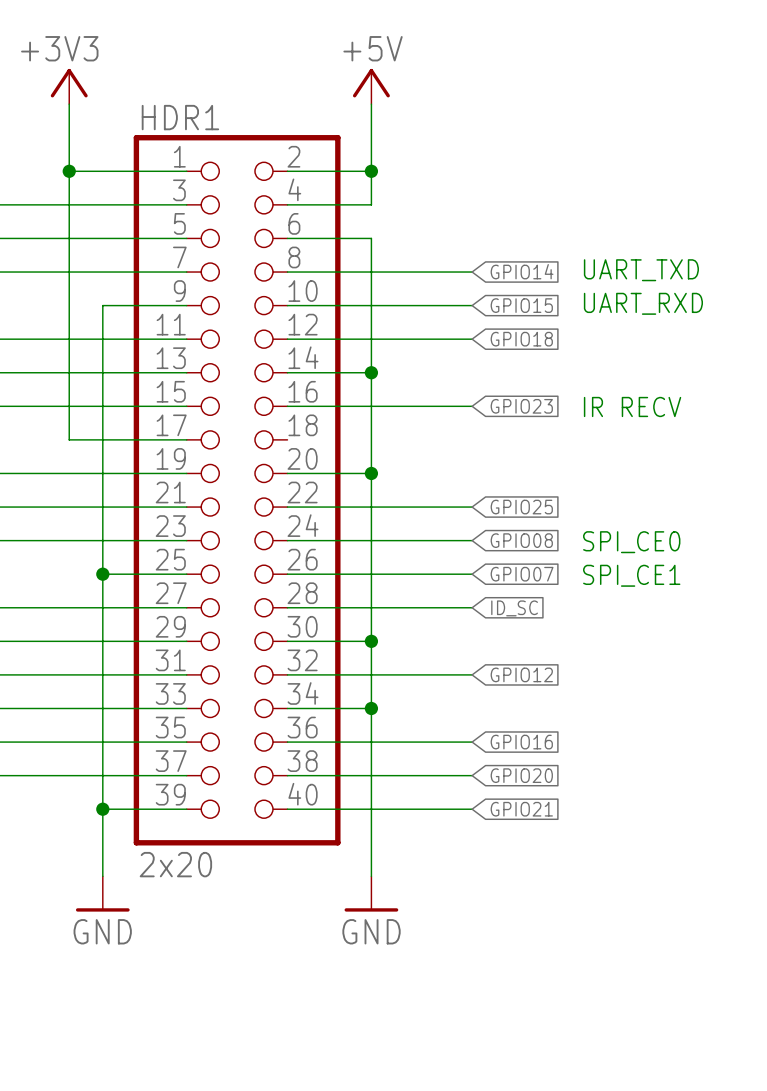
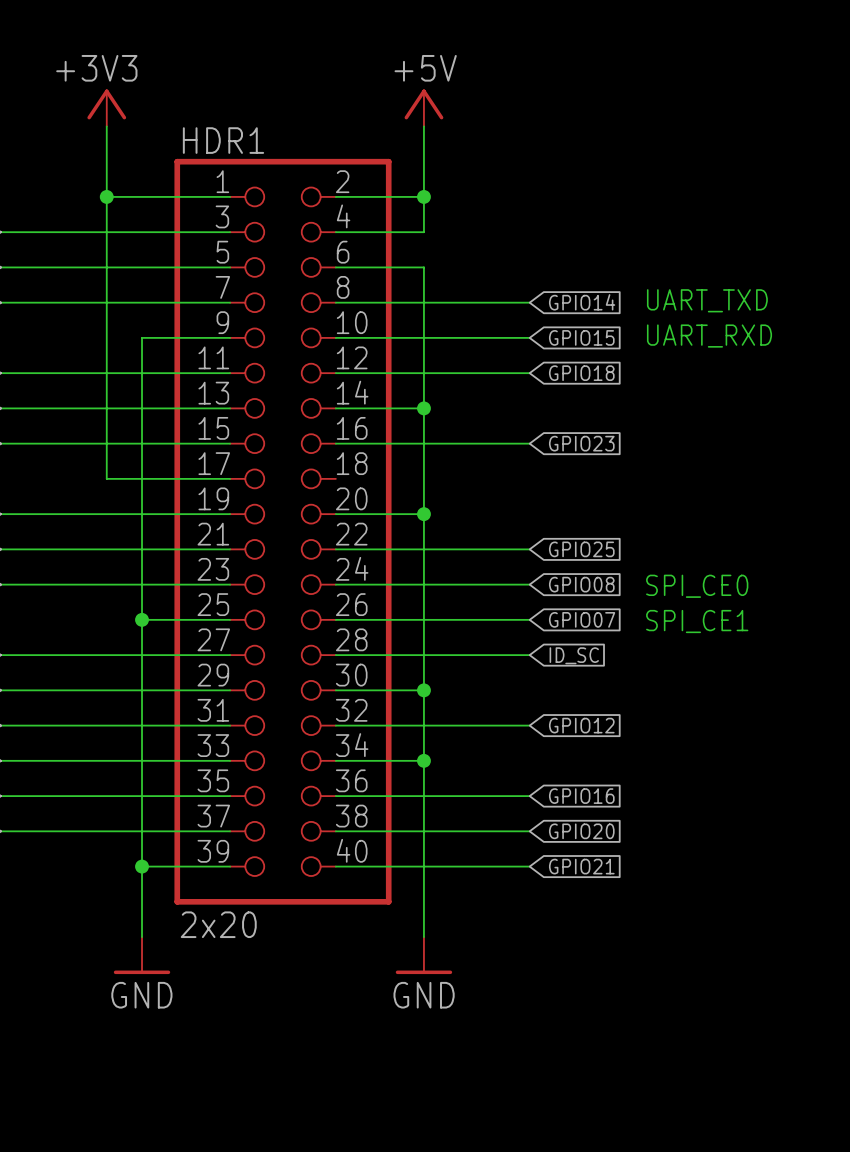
text: IR RECV (632, 406) -> none

